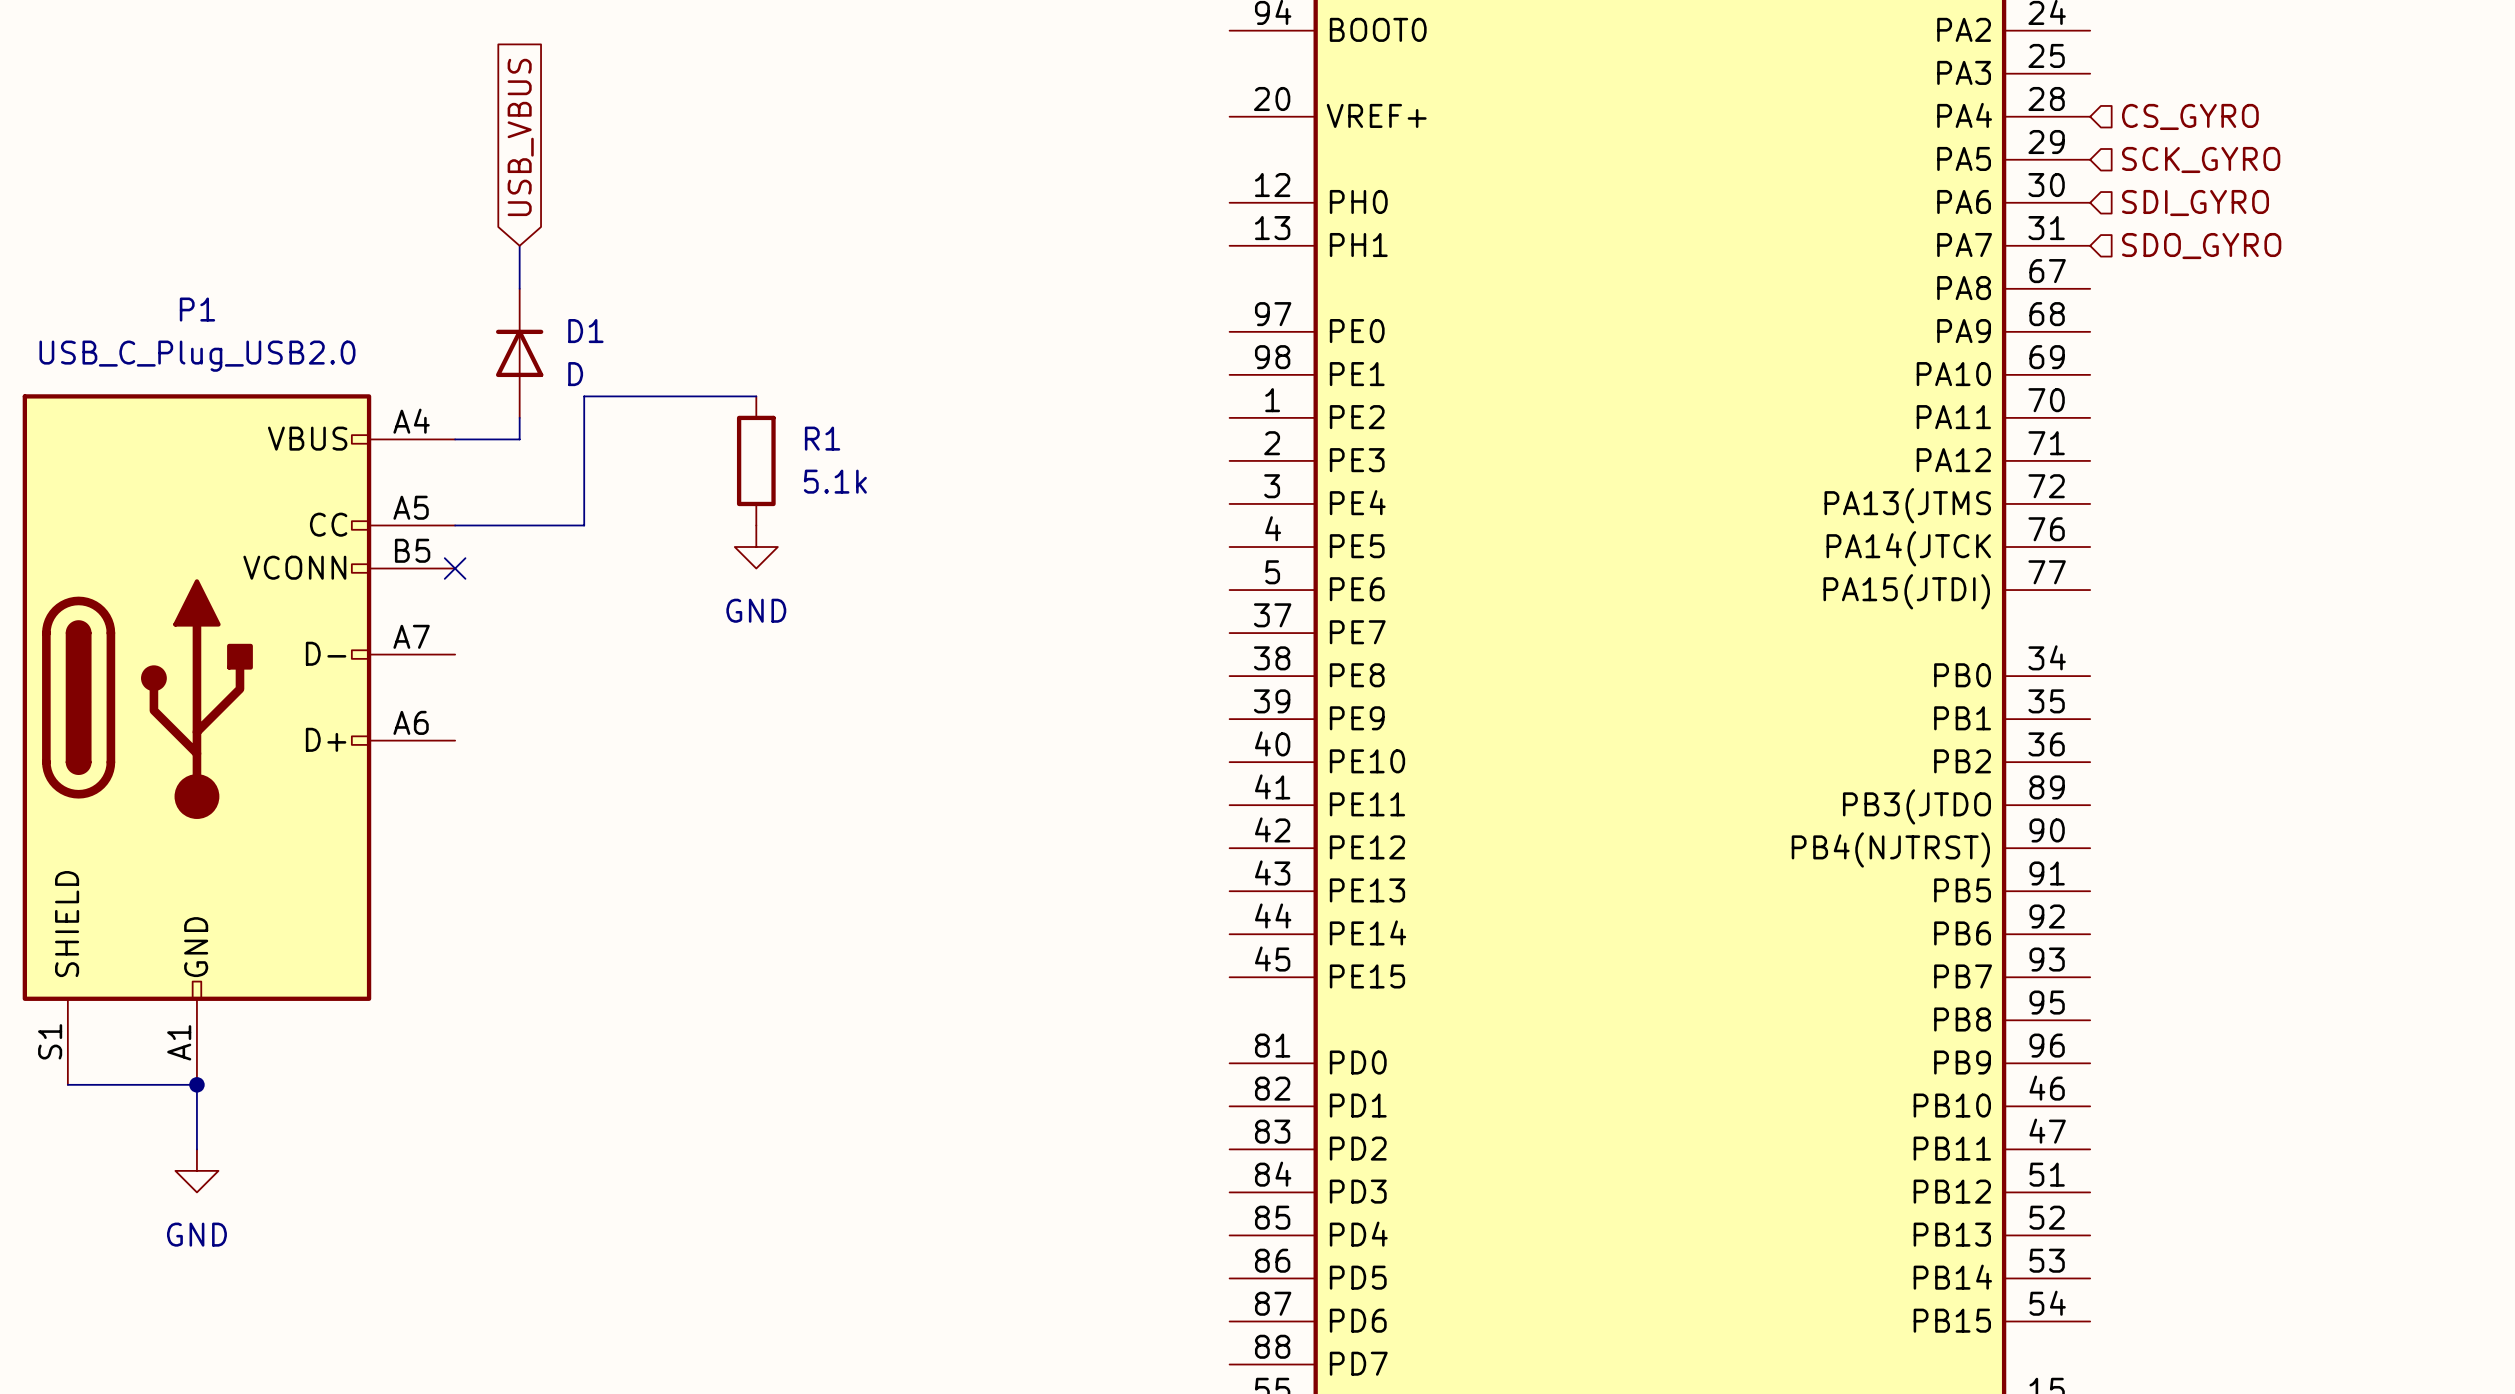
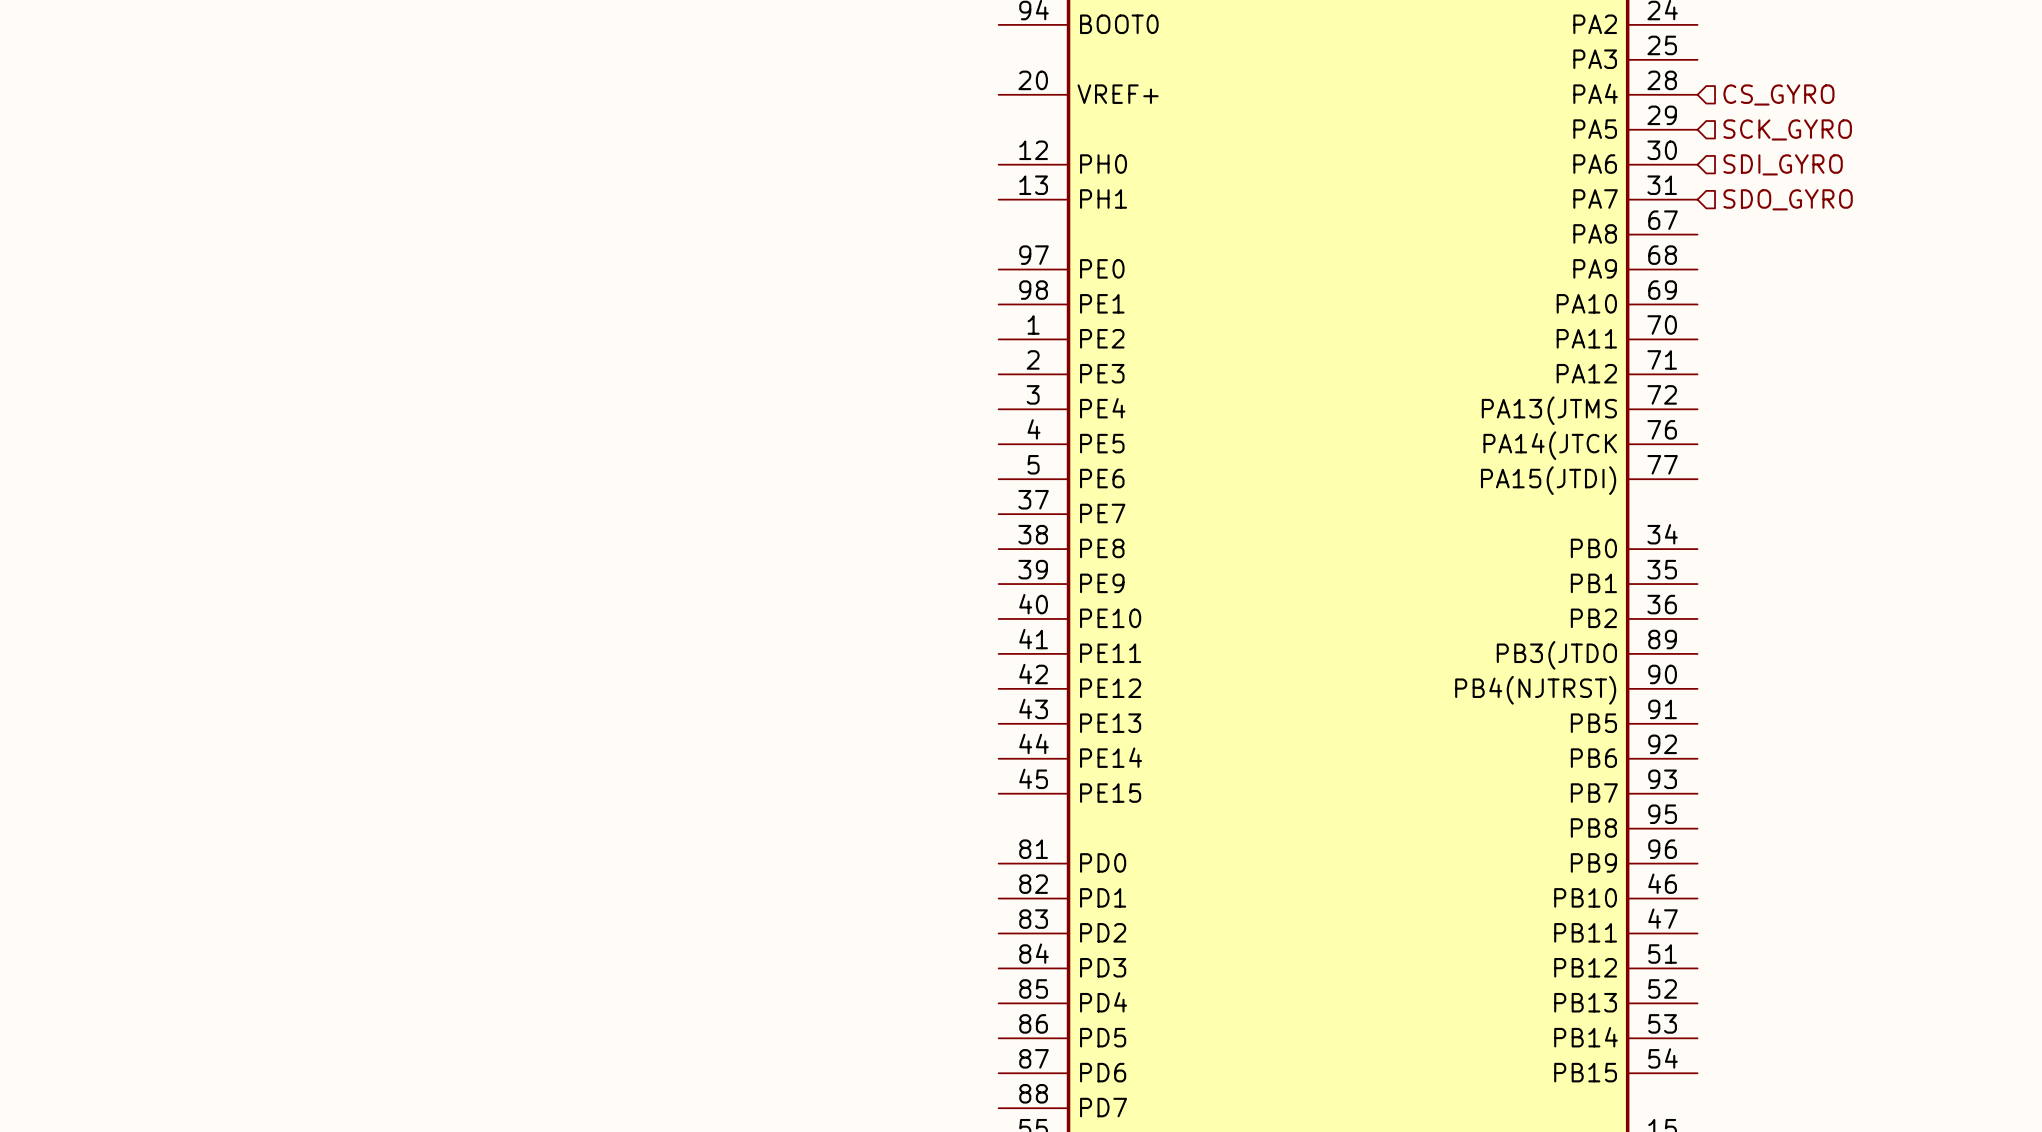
global label: USB_VBUS (520, 137) -> none
wire: (519, 245) (519, 288) -> none
D1: D (519, 353) -> none
wire: (756, 396) (584, 396) (584, 525) (455, 525) -> none
wire: (519, 417) (519, 439) (455, 439) -> none
R1: 5.1k (756, 460) -> none
power symbol: GND (756, 547) -> none
no-connect mark: (455, 568) -> none
P1: USB_C_Plug_USB2.0 (238, 739) -> none
wire: (67, 1084) (196, 1084) (196, 1149) -> none
junction: (196, 1084) -> none
power symbol: GND (196, 1170) -> none

